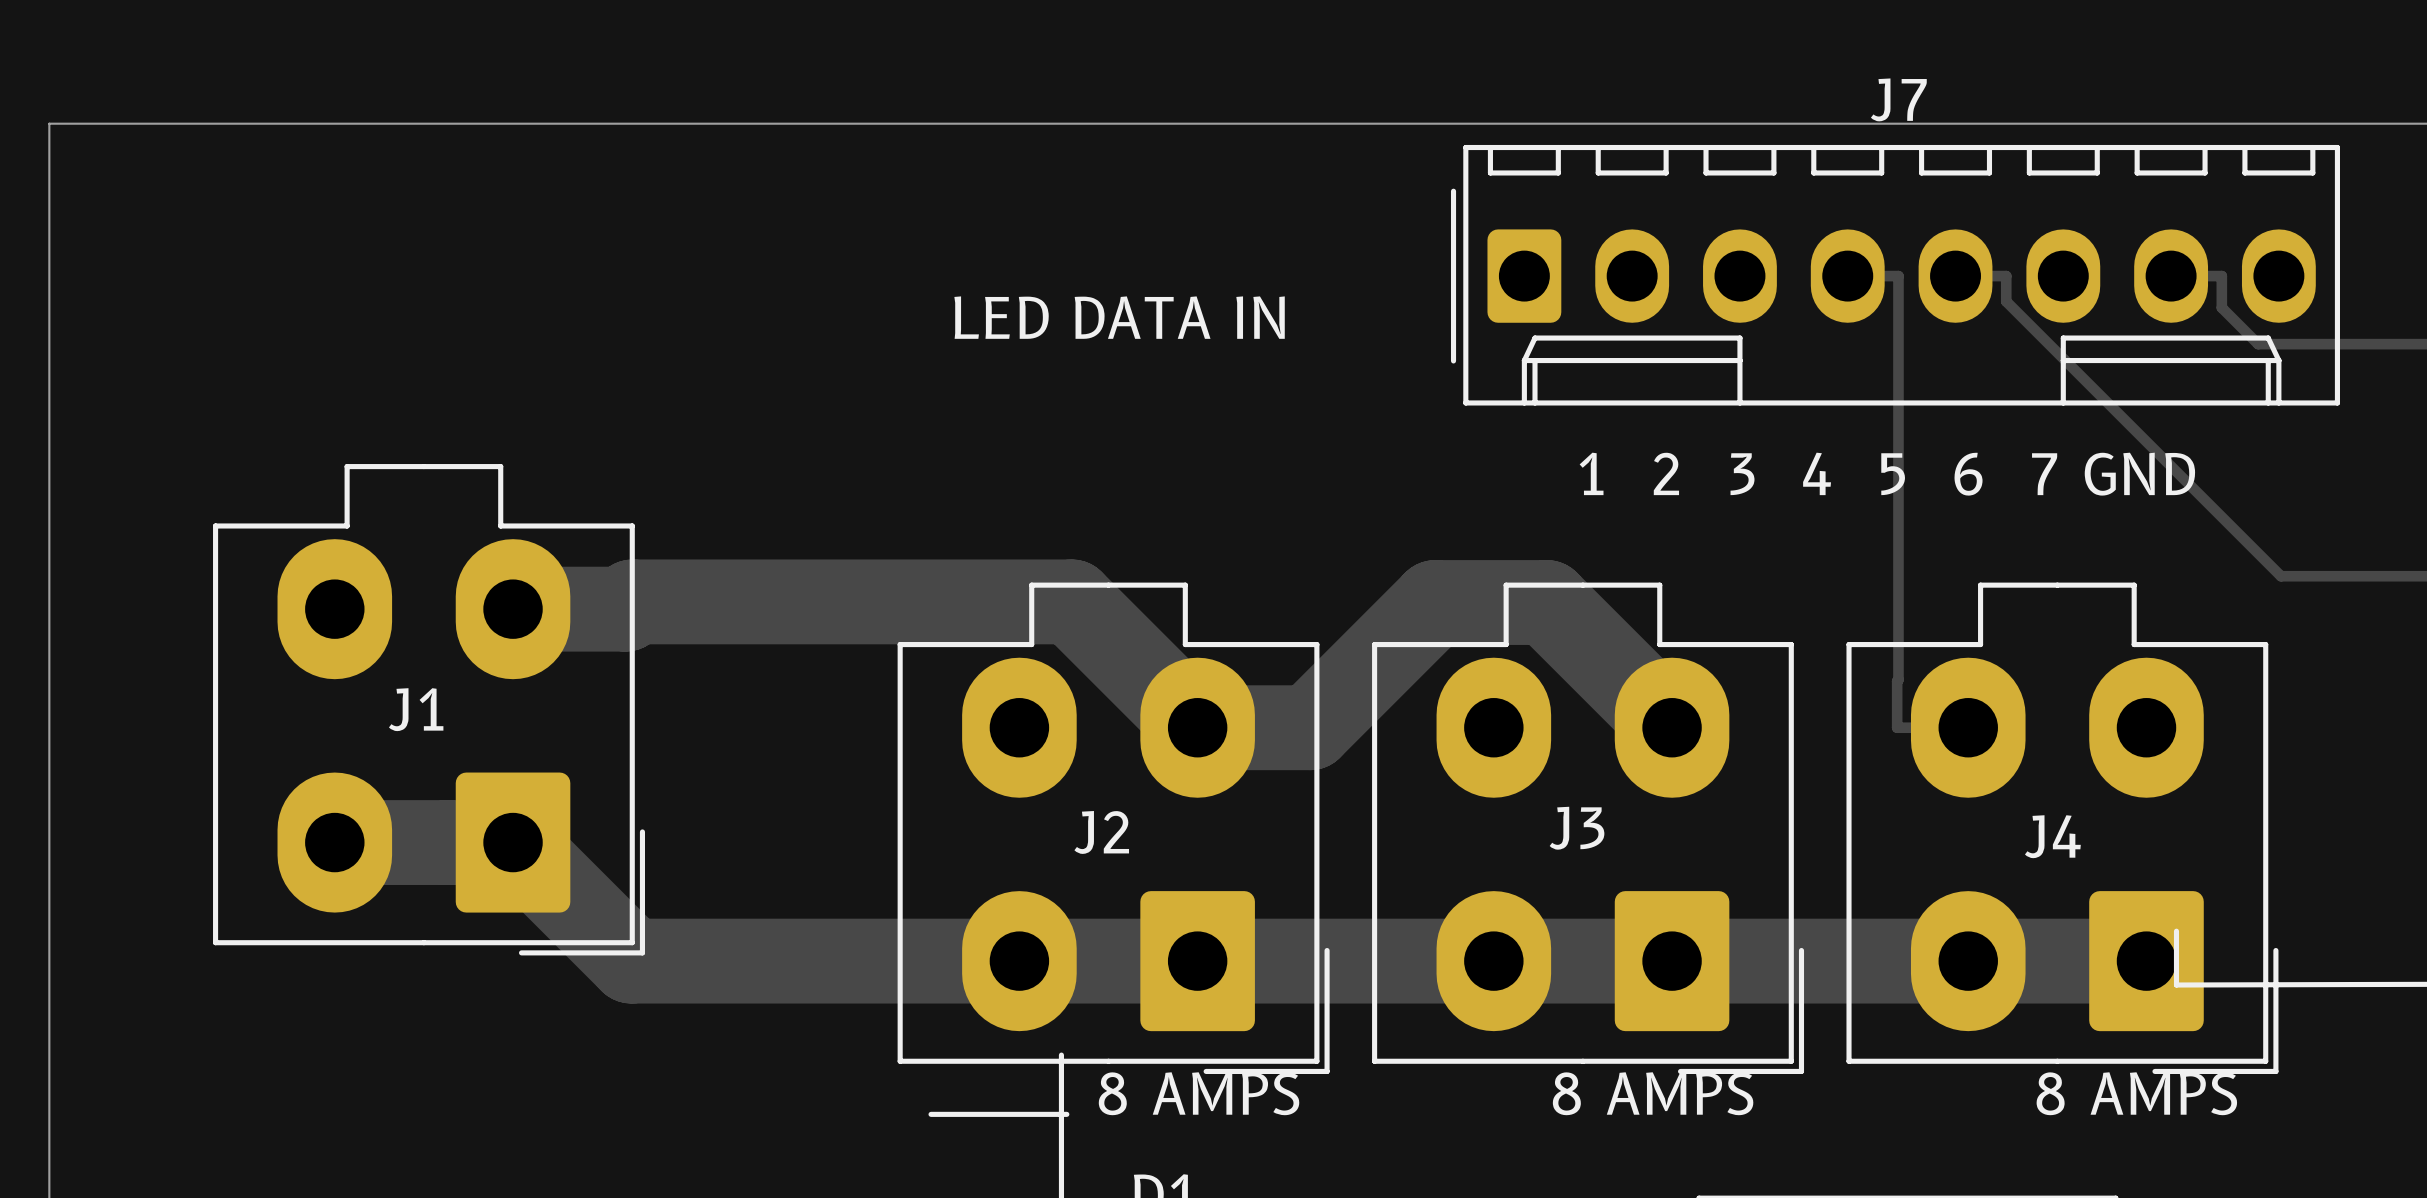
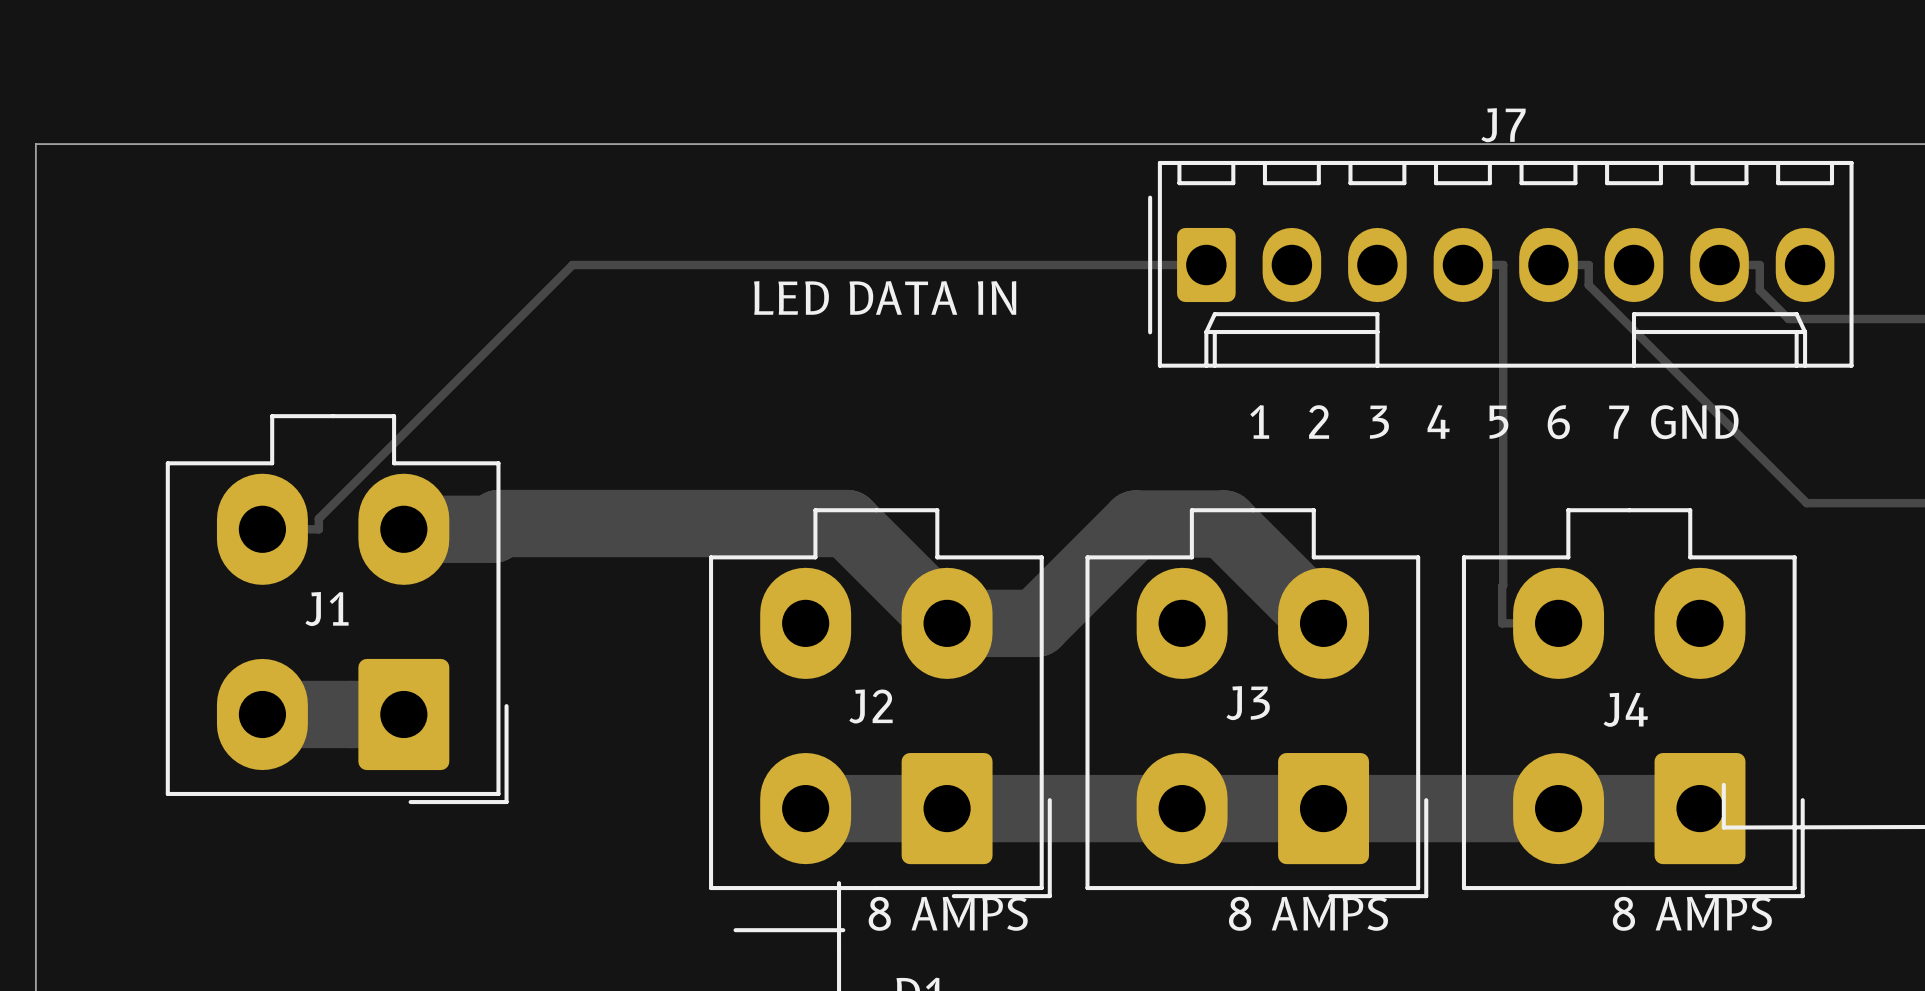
track: none -> (1206, 265) (572, 265) (318, 518) (318, 529) (262, 529)
track: (513, 842) (631, 961) (1019, 961) -> none

